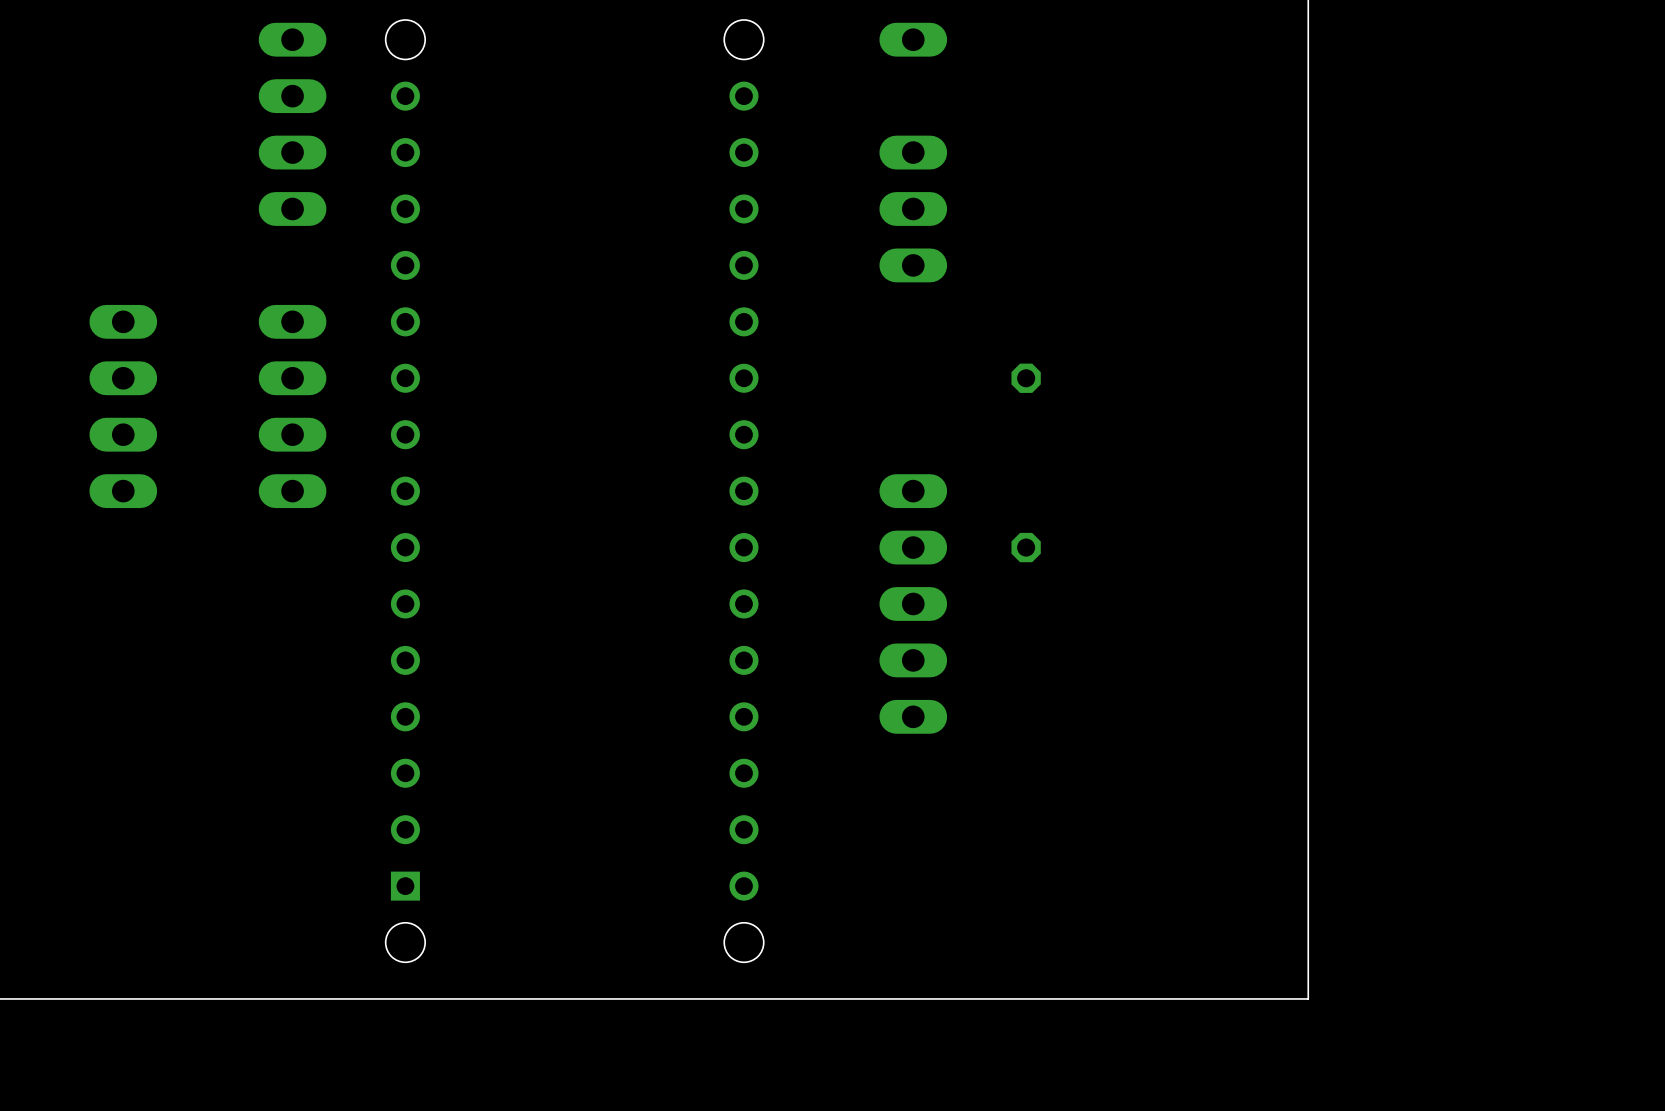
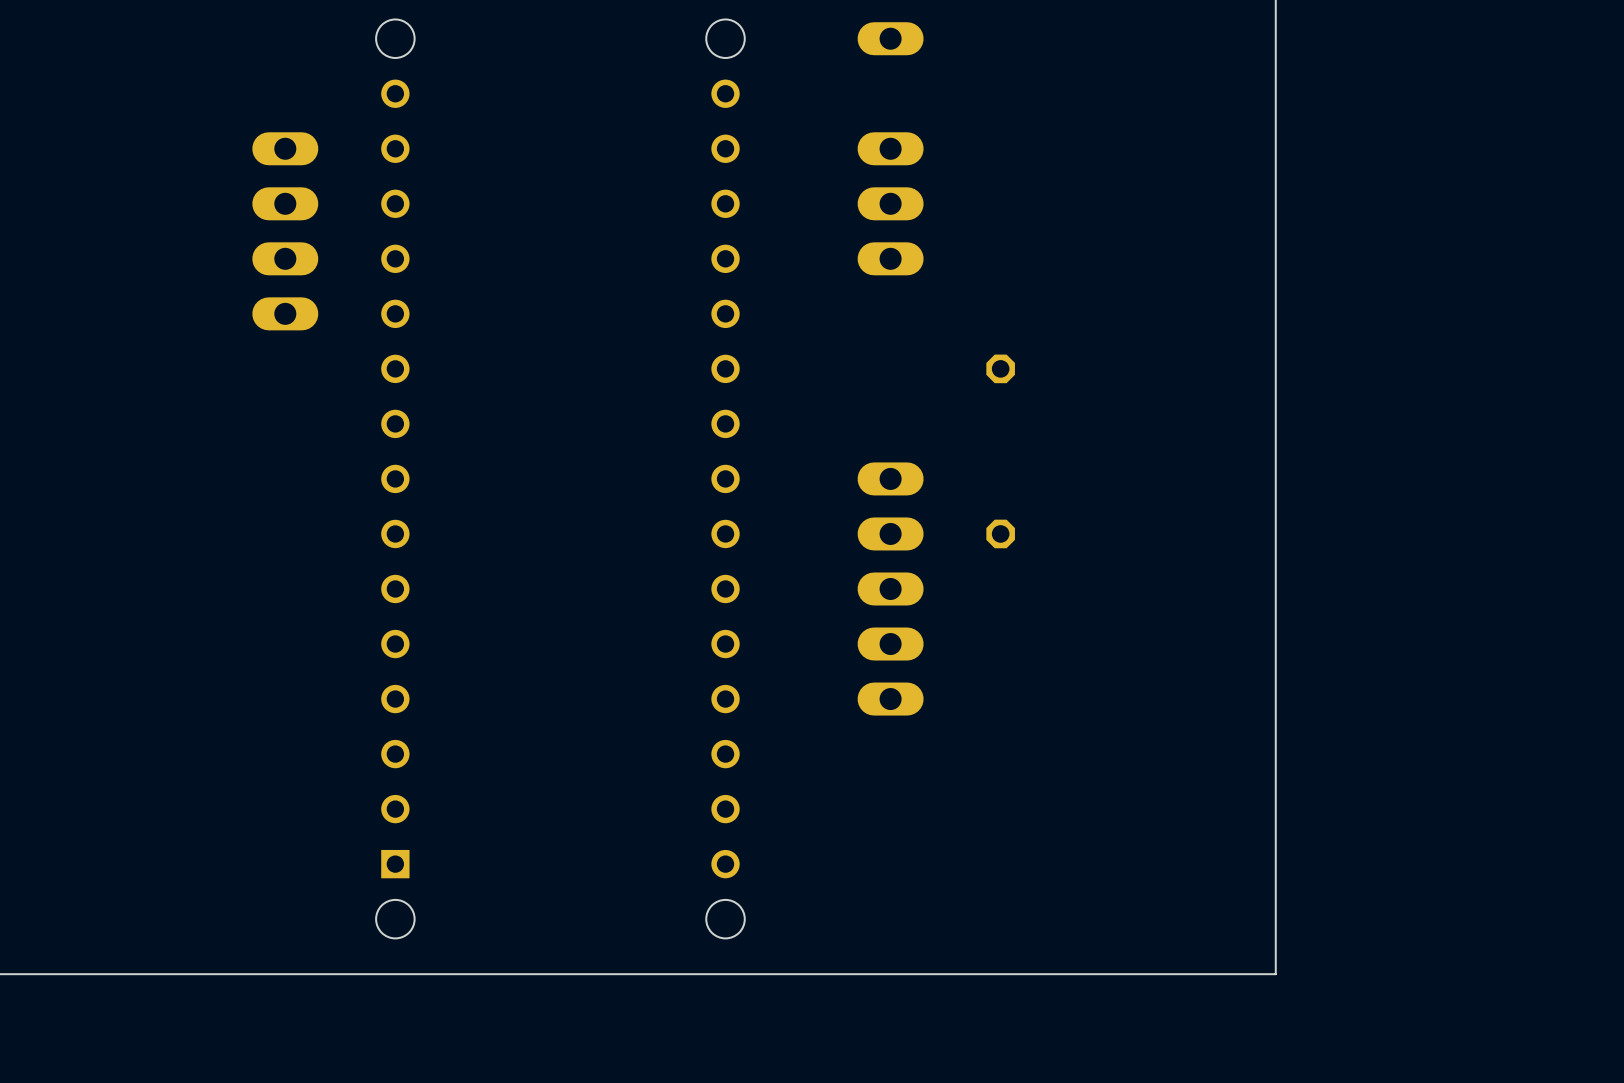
part: (292, 124) -> none
part: none -> (285, 231)
part: (123, 406) -> none
part: (292, 406) -> none

